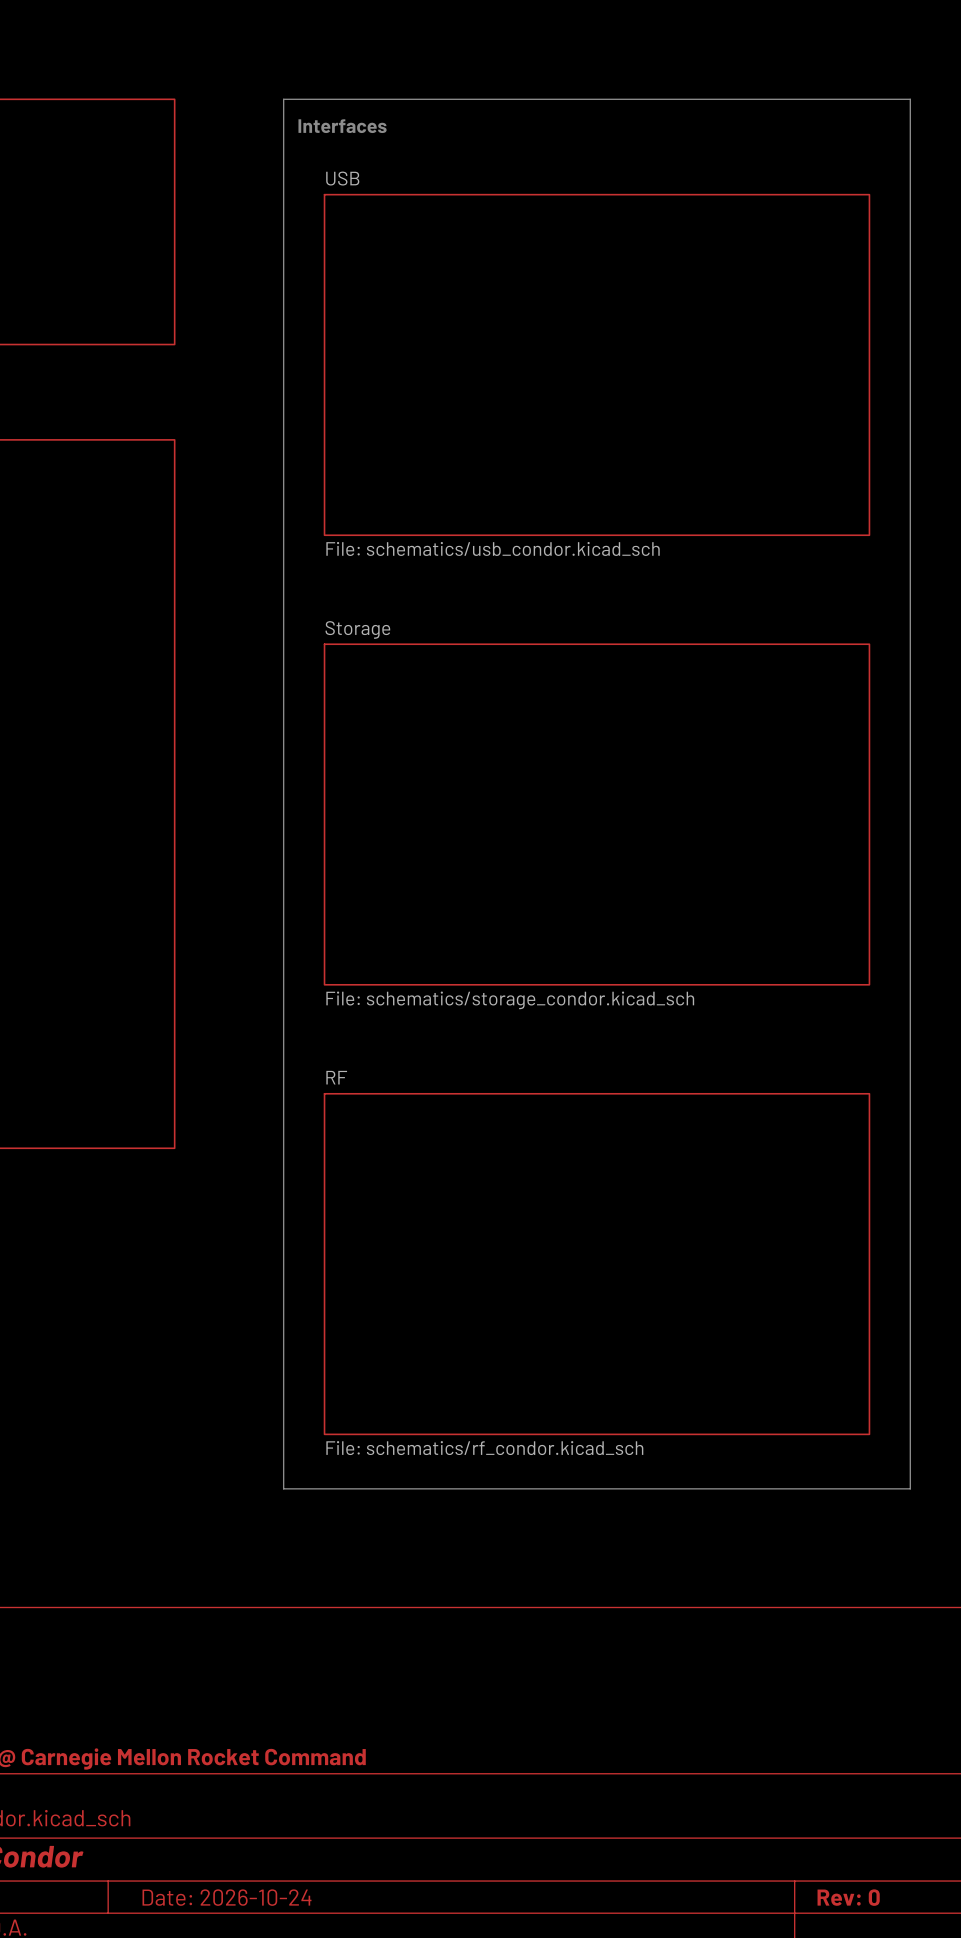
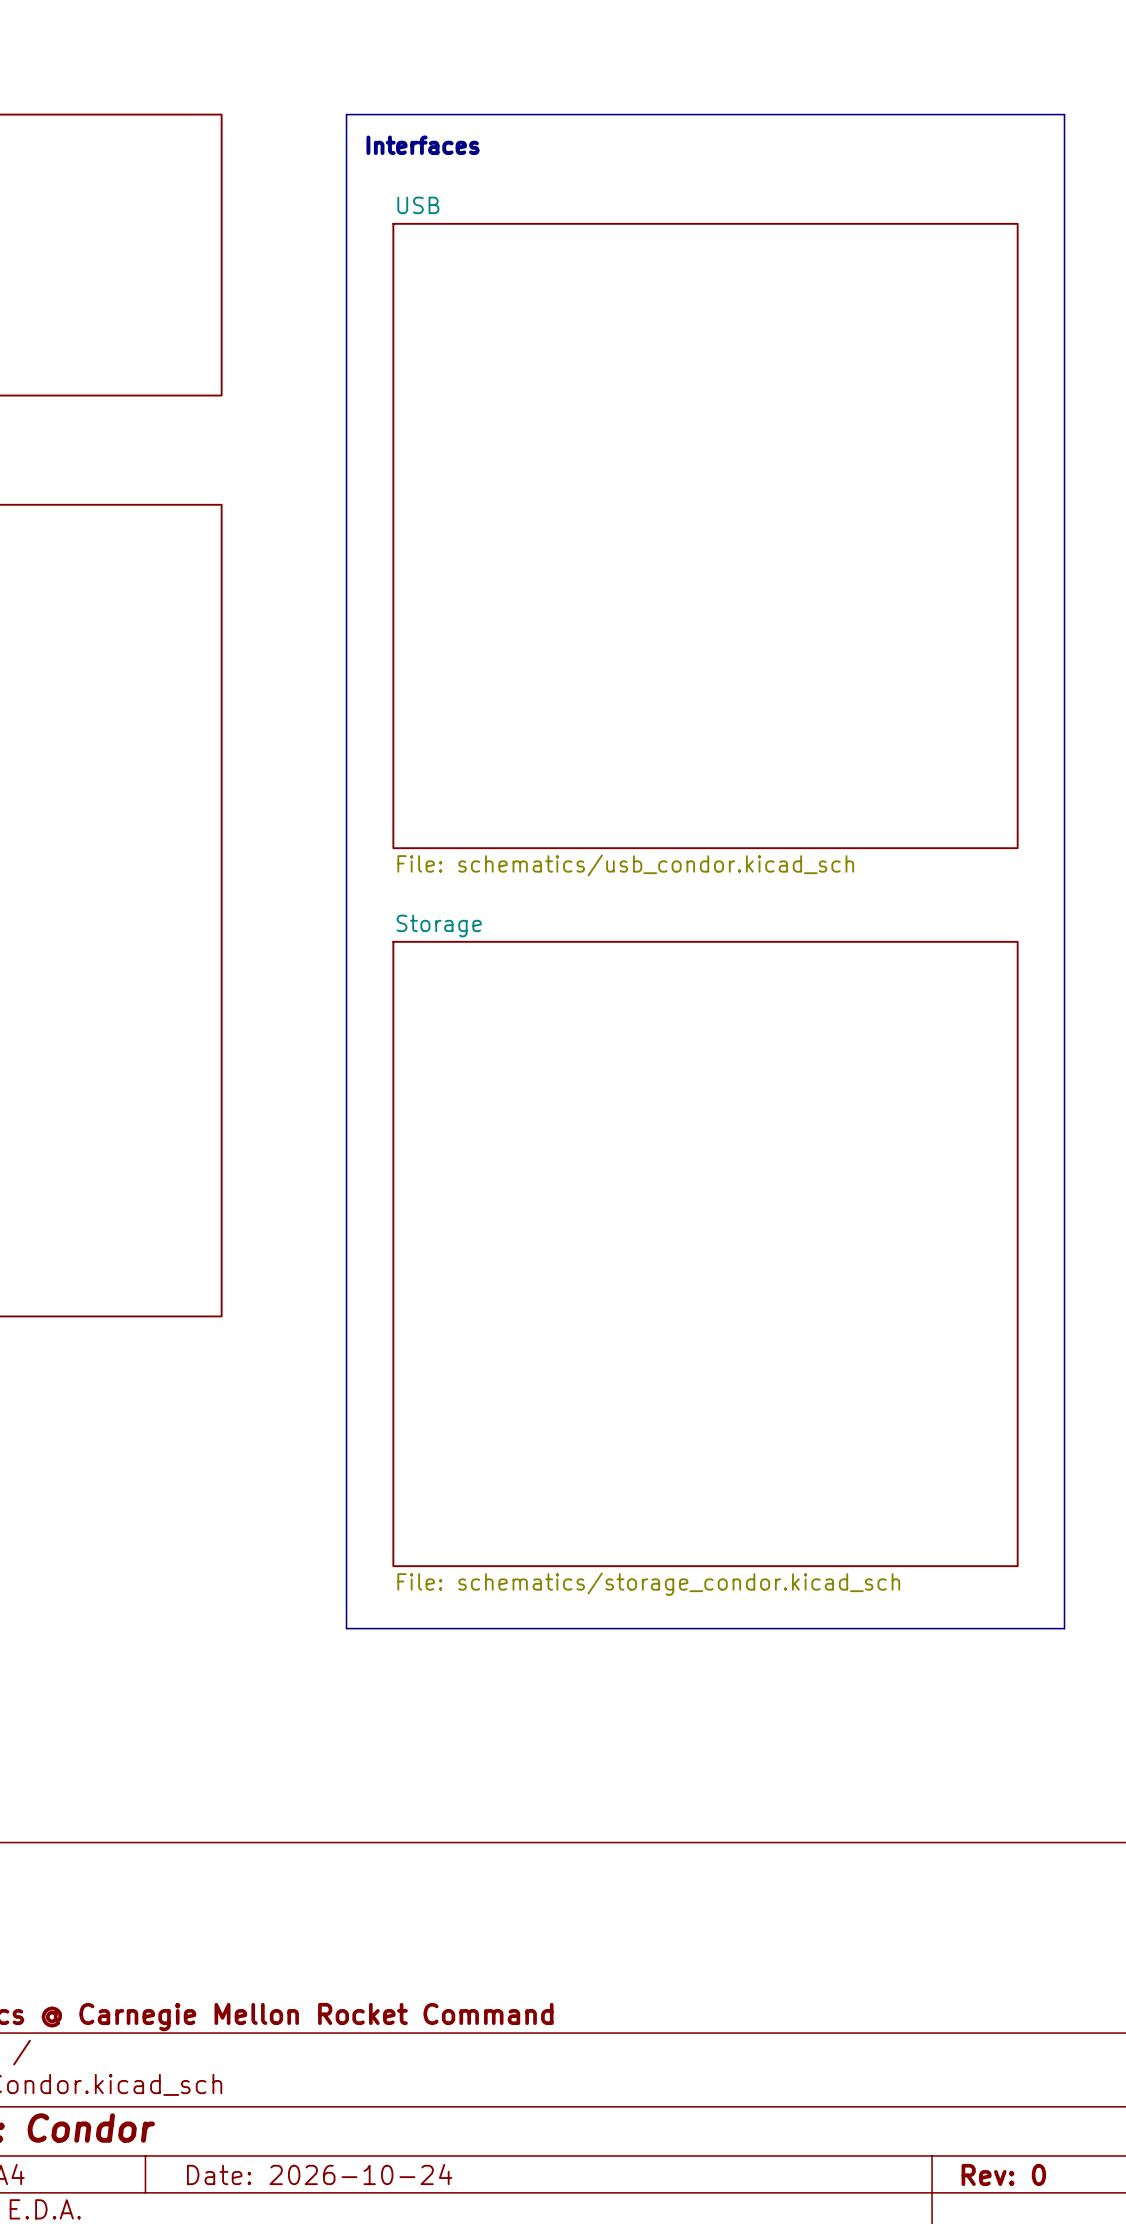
sheet USB: File: schematics/usb_condor.kicad_sch (596, 364) -> none
sheet USB: none -> File: schematics/usb_condor.kicad_sch (705, 536)
sheet Storage: File: schematics/storage_condor.kicad_sch (596, 814) -> none
sheet Storage: none -> File: schematics/storage_condor.kicad_sch (705, 1254)
sheet RF: File: schematics/rf_condor.kicad_sch (596, 1264) -> none
line: (283, 1420) (283, 1488) (910, 1488) (910, 1420) -> (346, 1628) (1064, 1628)

